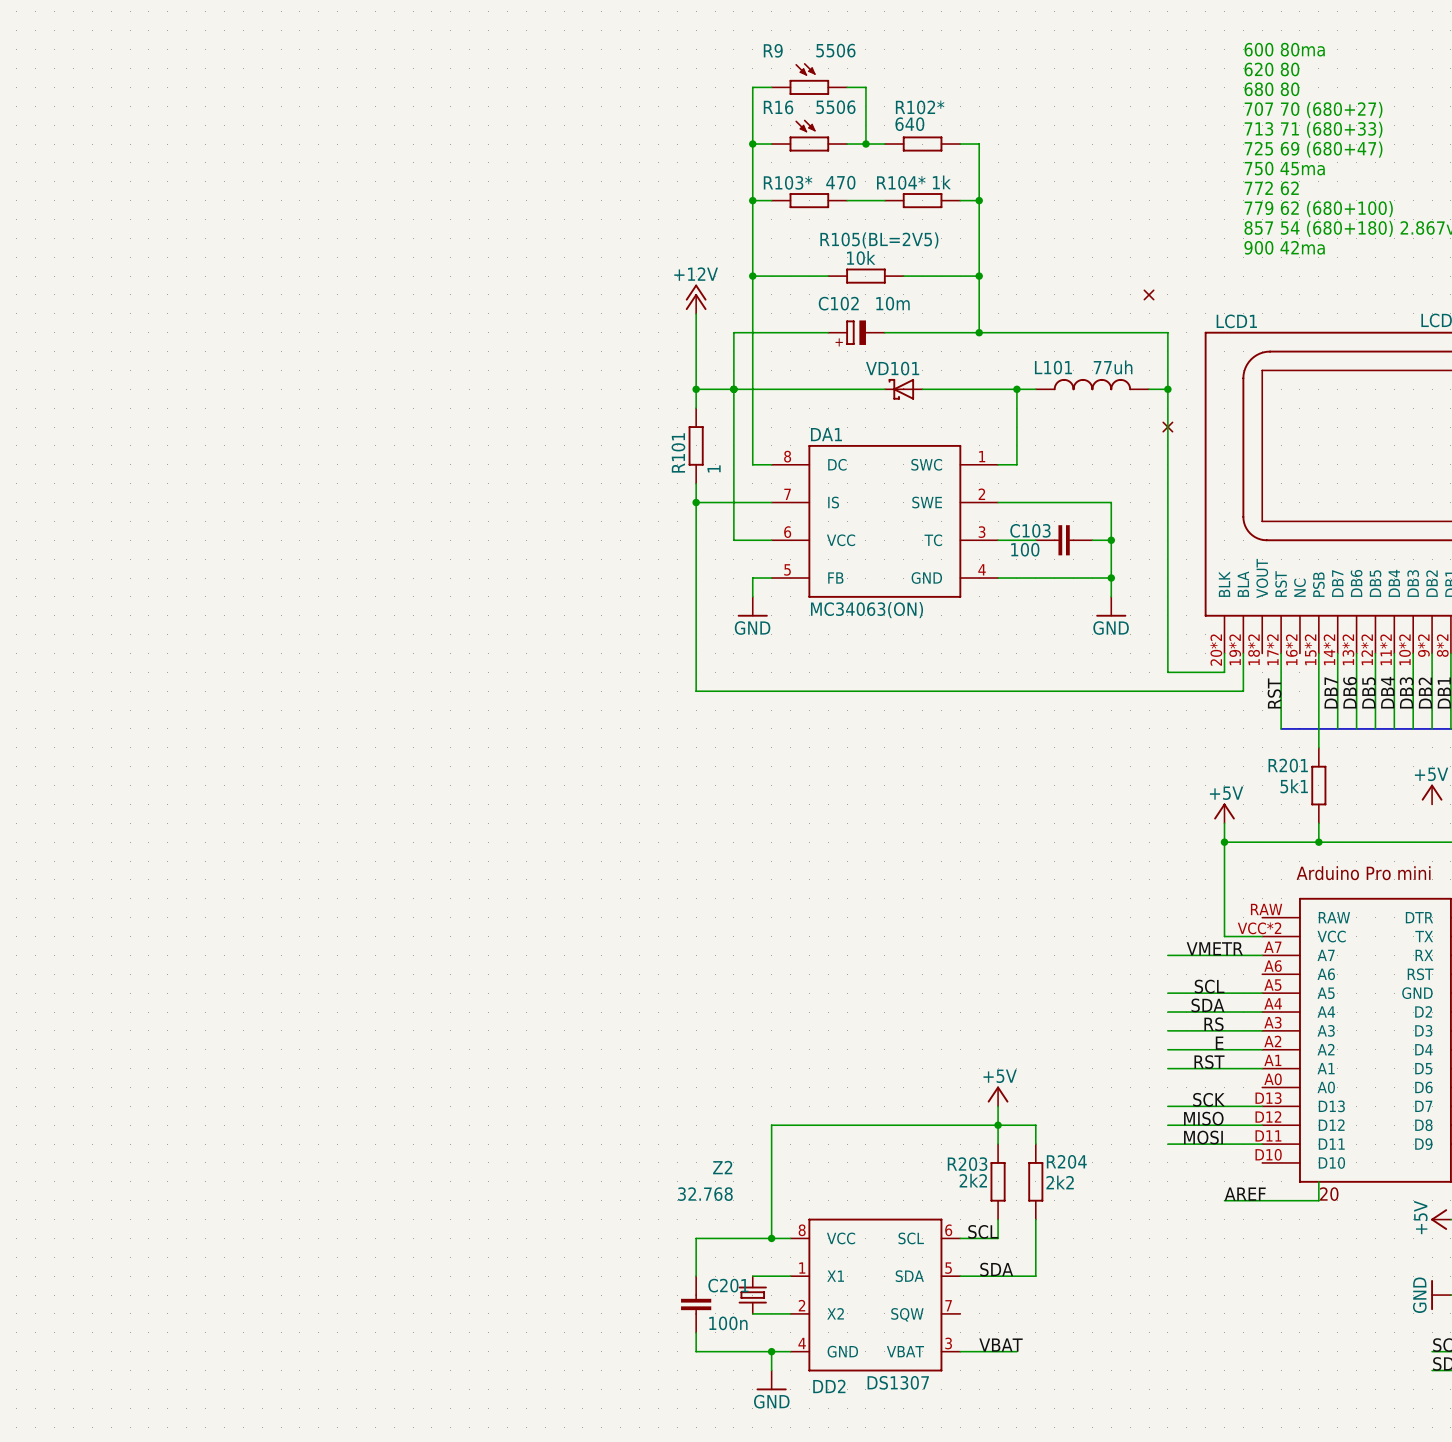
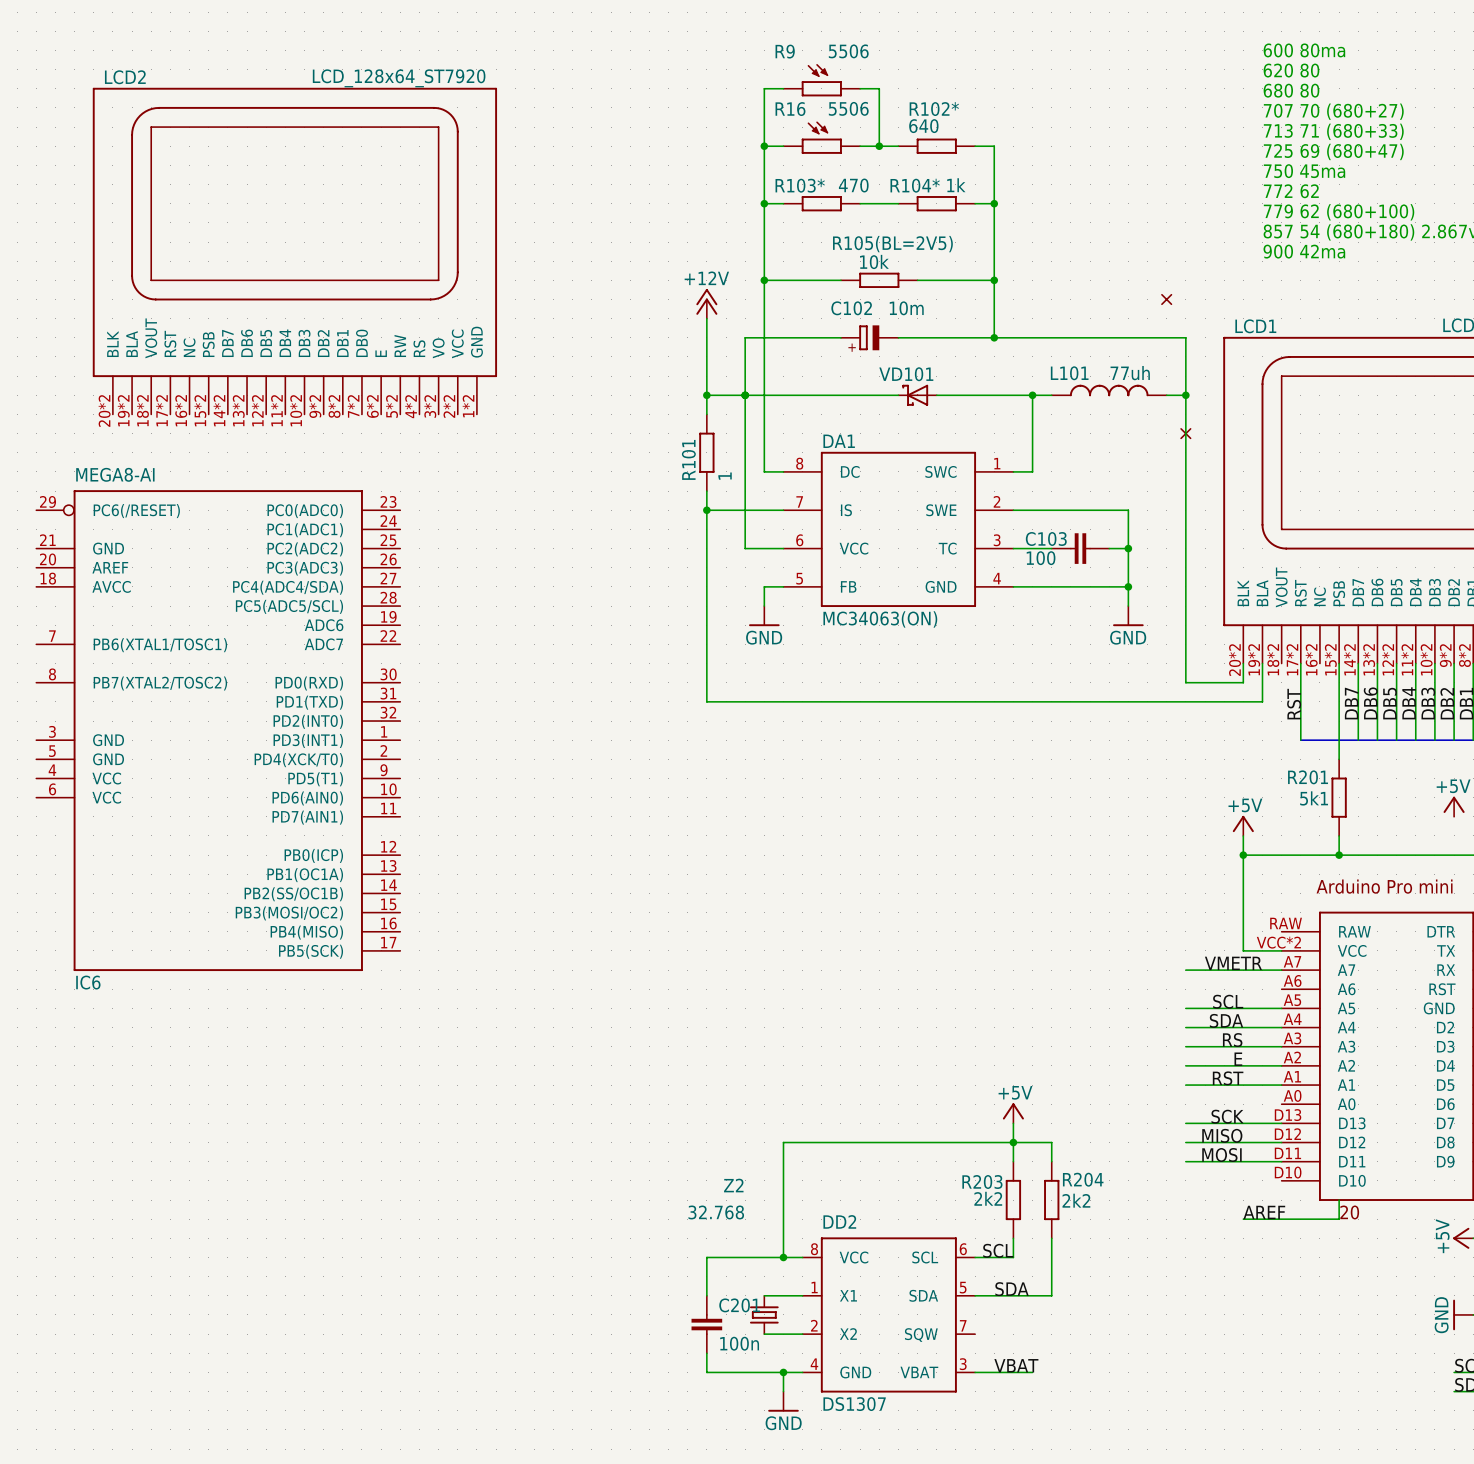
LCD2: none -> LCD_128x64_ST7920 (294, 251)
IC6: none -> MEGA8-AI (218, 730)
DD2 value position: DS1307 (898, 1382) -> DS1307 (854, 1404)
DD2 name position: DD2 (829, 1386) -> DD2 (839, 1221)

